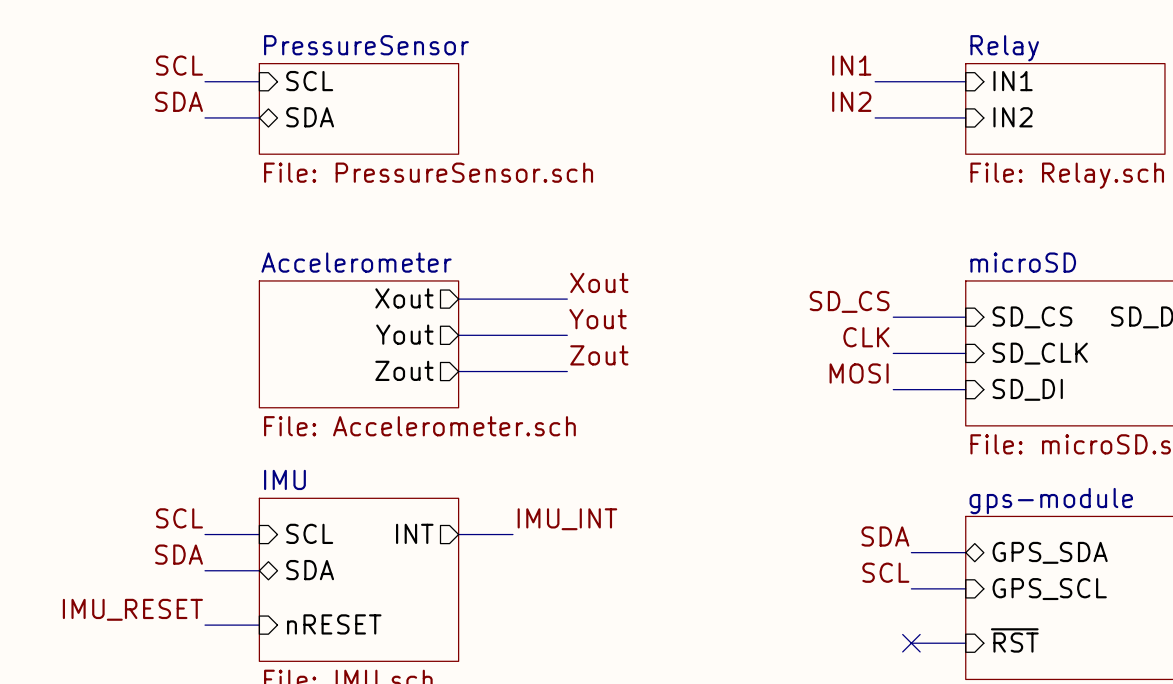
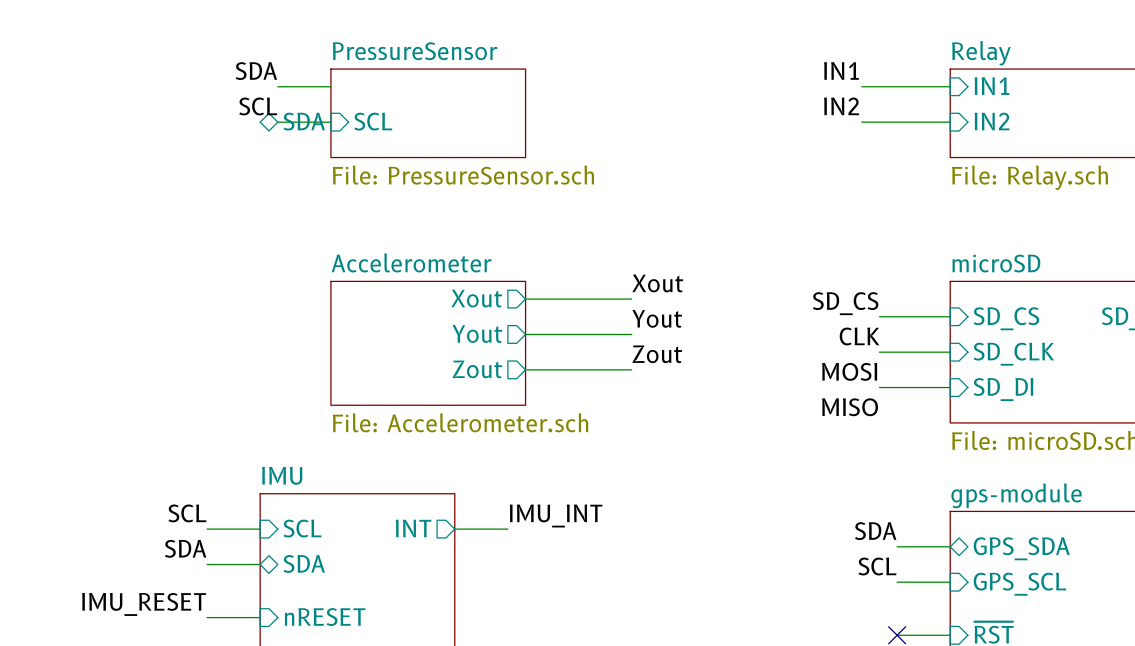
label position: SCL (179, 65) -> SCL (258, 106)
wire: (205, 81) (259, 81) -> (277, 86) (330, 86)
sheet pin position: SCL (309, 81) -> SCL (373, 121)
label position: SDA (179, 101) -> SDA (256, 71)
sheet PressureSensor position: (359, 108) -> (428, 113)
wire: (205, 117) (259, 117) -> (277, 122) (330, 122)
label position: Xout (599, 282) -> Xout (657, 283)
sheet pin position: Xout (404, 298) -> Xout (476, 298)
wire: (458, 299) (531, 299) -> (560, 299) (631, 299)
label position: Yout (598, 319) -> Yout (657, 318)
sheet pin position: Yout (404, 334) -> Yout (477, 333)
wire: (458, 335) (531, 335) -> (560, 334) (631, 334)
sheet Accelerometer position: (359, 344) -> (428, 343)
label position: Zout (599, 355) -> Zout (657, 354)
sheet pin position: Zout (404, 370) -> Zout (477, 369)
wire: (458, 371) (531, 371) -> (560, 369) (631, 369)
label: none -> MISO (850, 407)

